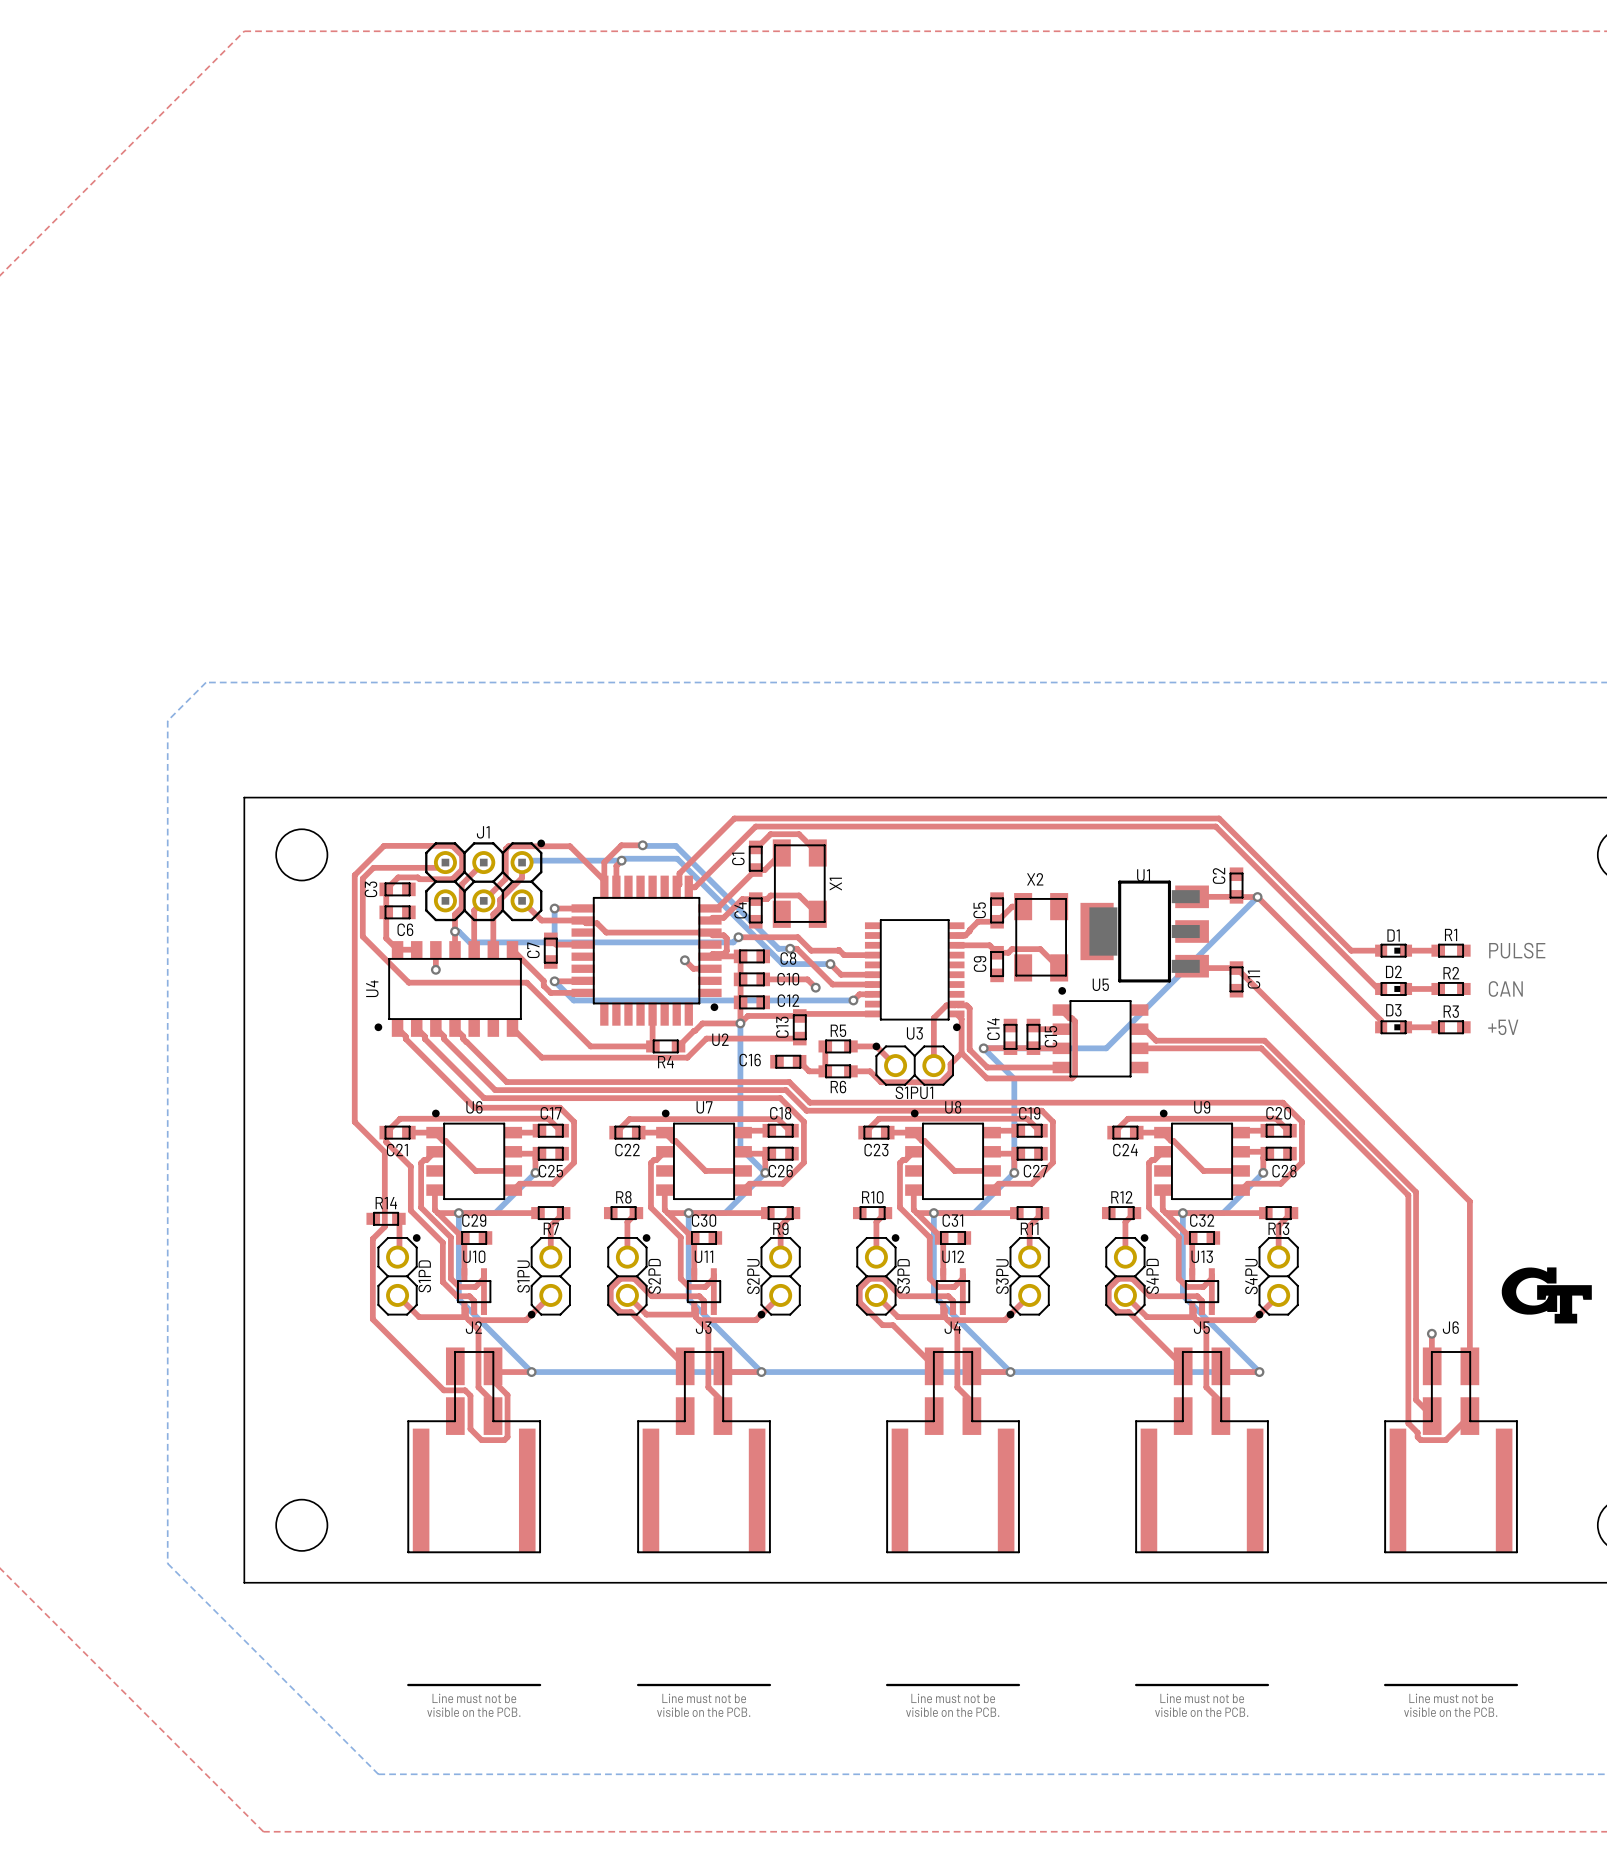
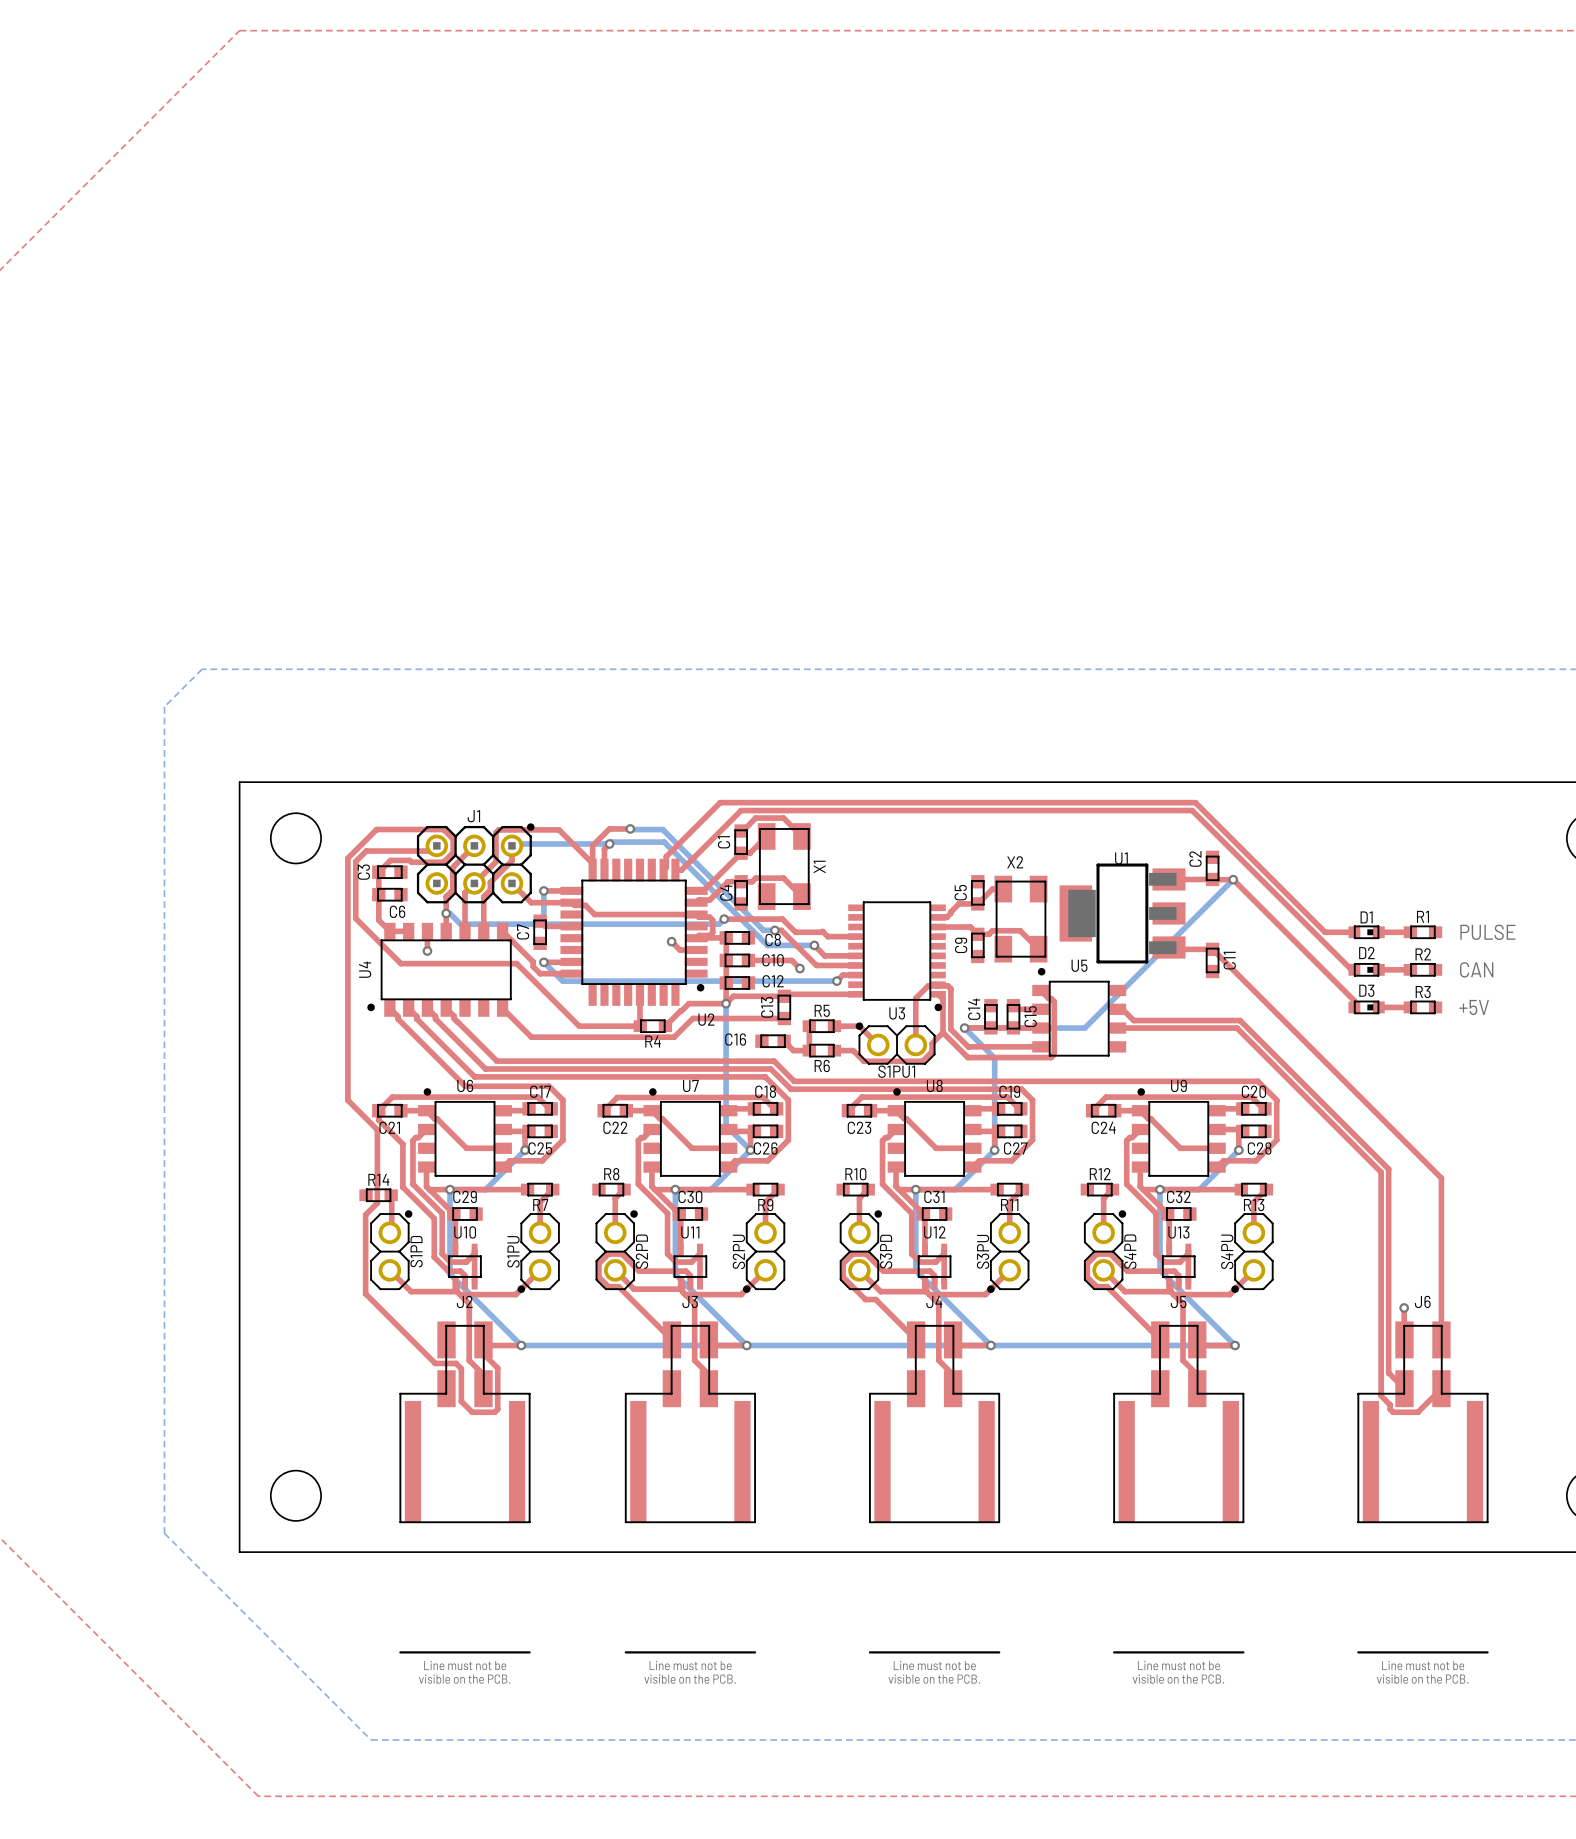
drawing: [1501, 1267, 1592, 1324] -> none

